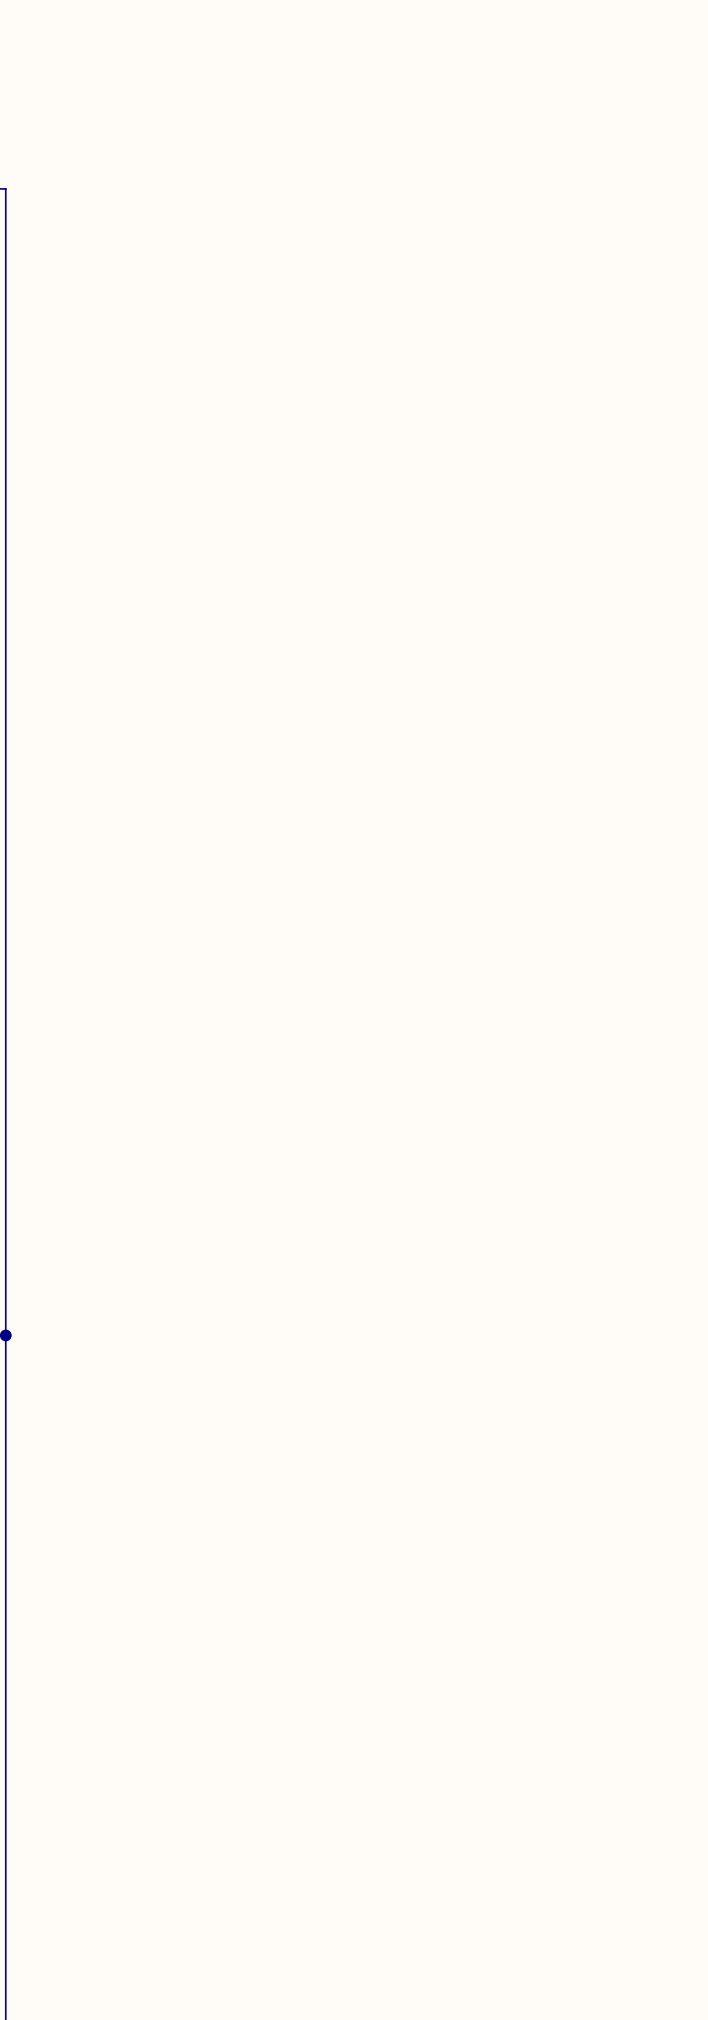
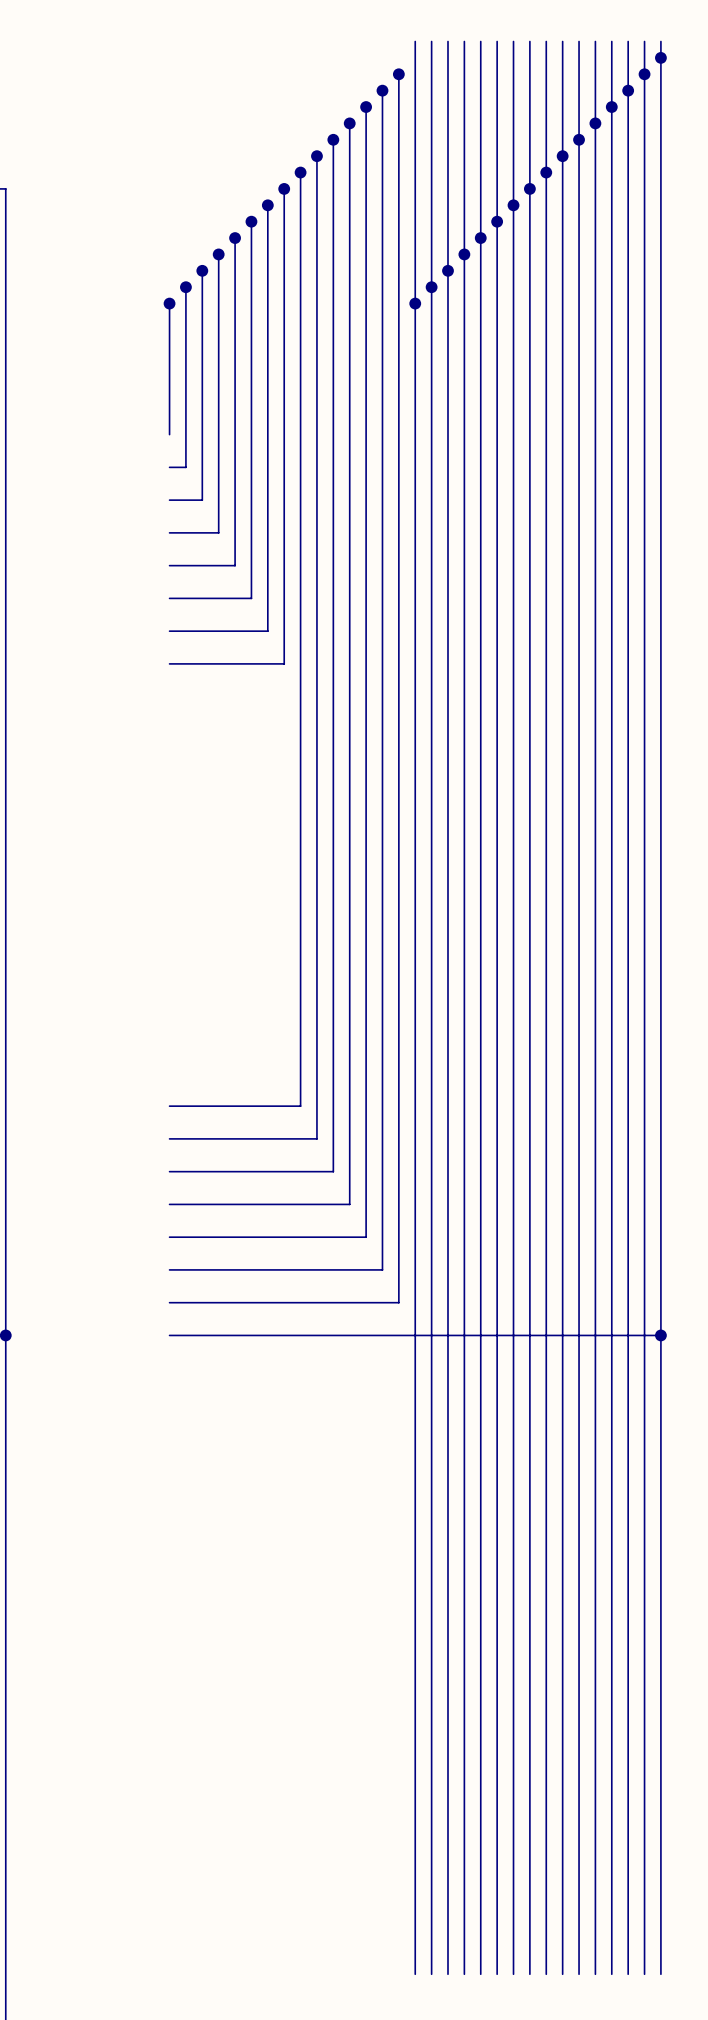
wire: none -> (415, 41) (415, 1974)
wire: none -> (431, 41) (431, 1974)
wire: none -> (447, 41) (447, 1974)
wire: none -> (464, 41) (464, 1974)
wire: none -> (480, 41) (480, 1974)
wire: none -> (497, 41) (497, 1974)
wire: none -> (513, 41) (513, 1974)
wire: none -> (529, 41) (529, 1974)
wire: none -> (546, 41) (546, 1974)
wire: none -> (562, 41) (562, 1974)
wire: none -> (579, 41) (579, 1974)
wire: none -> (595, 41) (595, 1974)
wire: none -> (611, 41) (611, 1974)
wire: none -> (628, 41) (628, 1974)
wire: none -> (644, 41) (644, 1974)
wire: none -> (660, 41) (660, 1974)
junction: none -> (660, 57)
wire: none -> (398, 74) (398, 1302) (169, 1302)
junction: none -> (398, 74)
junction: none -> (644, 74)
wire: none -> (382, 90) (382, 1269) (169, 1269)
junction: none -> (382, 90)
junction: none -> (628, 90)
wire: none -> (366, 107) (366, 1237) (169, 1237)
junction: none -> (366, 107)
junction: none -> (611, 107)
wire: none -> (349, 123) (349, 1204) (169, 1204)
junction: none -> (349, 123)
junction: none -> (595, 123)
wire: none -> (333, 139) (333, 1171) (169, 1171)
junction: none -> (333, 139)
junction: none -> (579, 139)
wire: none -> (316, 156) (316, 1138) (169, 1138)
junction: none -> (316, 156)
junction: none -> (562, 156)
wire: none -> (300, 172) (300, 1106) (169, 1106)
junction: none -> (300, 172)
junction: none -> (546, 172)
wire: none -> (284, 188) (284, 663) (169, 663)
junction: none -> (284, 188)
junction: none -> (529, 188)
wire: none -> (267, 205) (267, 631) (169, 631)
junction: none -> (267, 205)
junction: none -> (513, 205)
wire: none -> (251, 221) (251, 598) (169, 598)
junction: none -> (251, 221)
junction: none -> (497, 221)
wire: none -> (235, 238) (235, 565) (169, 565)
junction: none -> (235, 238)
junction: none -> (480, 238)
wire: none -> (218, 254) (218, 532) (169, 532)
junction: none -> (218, 254)
junction: none -> (464, 254)
wire: none -> (202, 270) (202, 500) (169, 500)
junction: none -> (202, 270)
junction: none -> (447, 270)
wire: none -> (185, 287) (185, 467) (169, 467)
junction: none -> (185, 287)
junction: none -> (431, 287)
wire: none -> (169, 303) (169, 434)
junction: none -> (169, 303)
junction: none -> (415, 303)
wire: none -> (169, 1335) (660, 1335)
junction: none -> (660, 1335)

